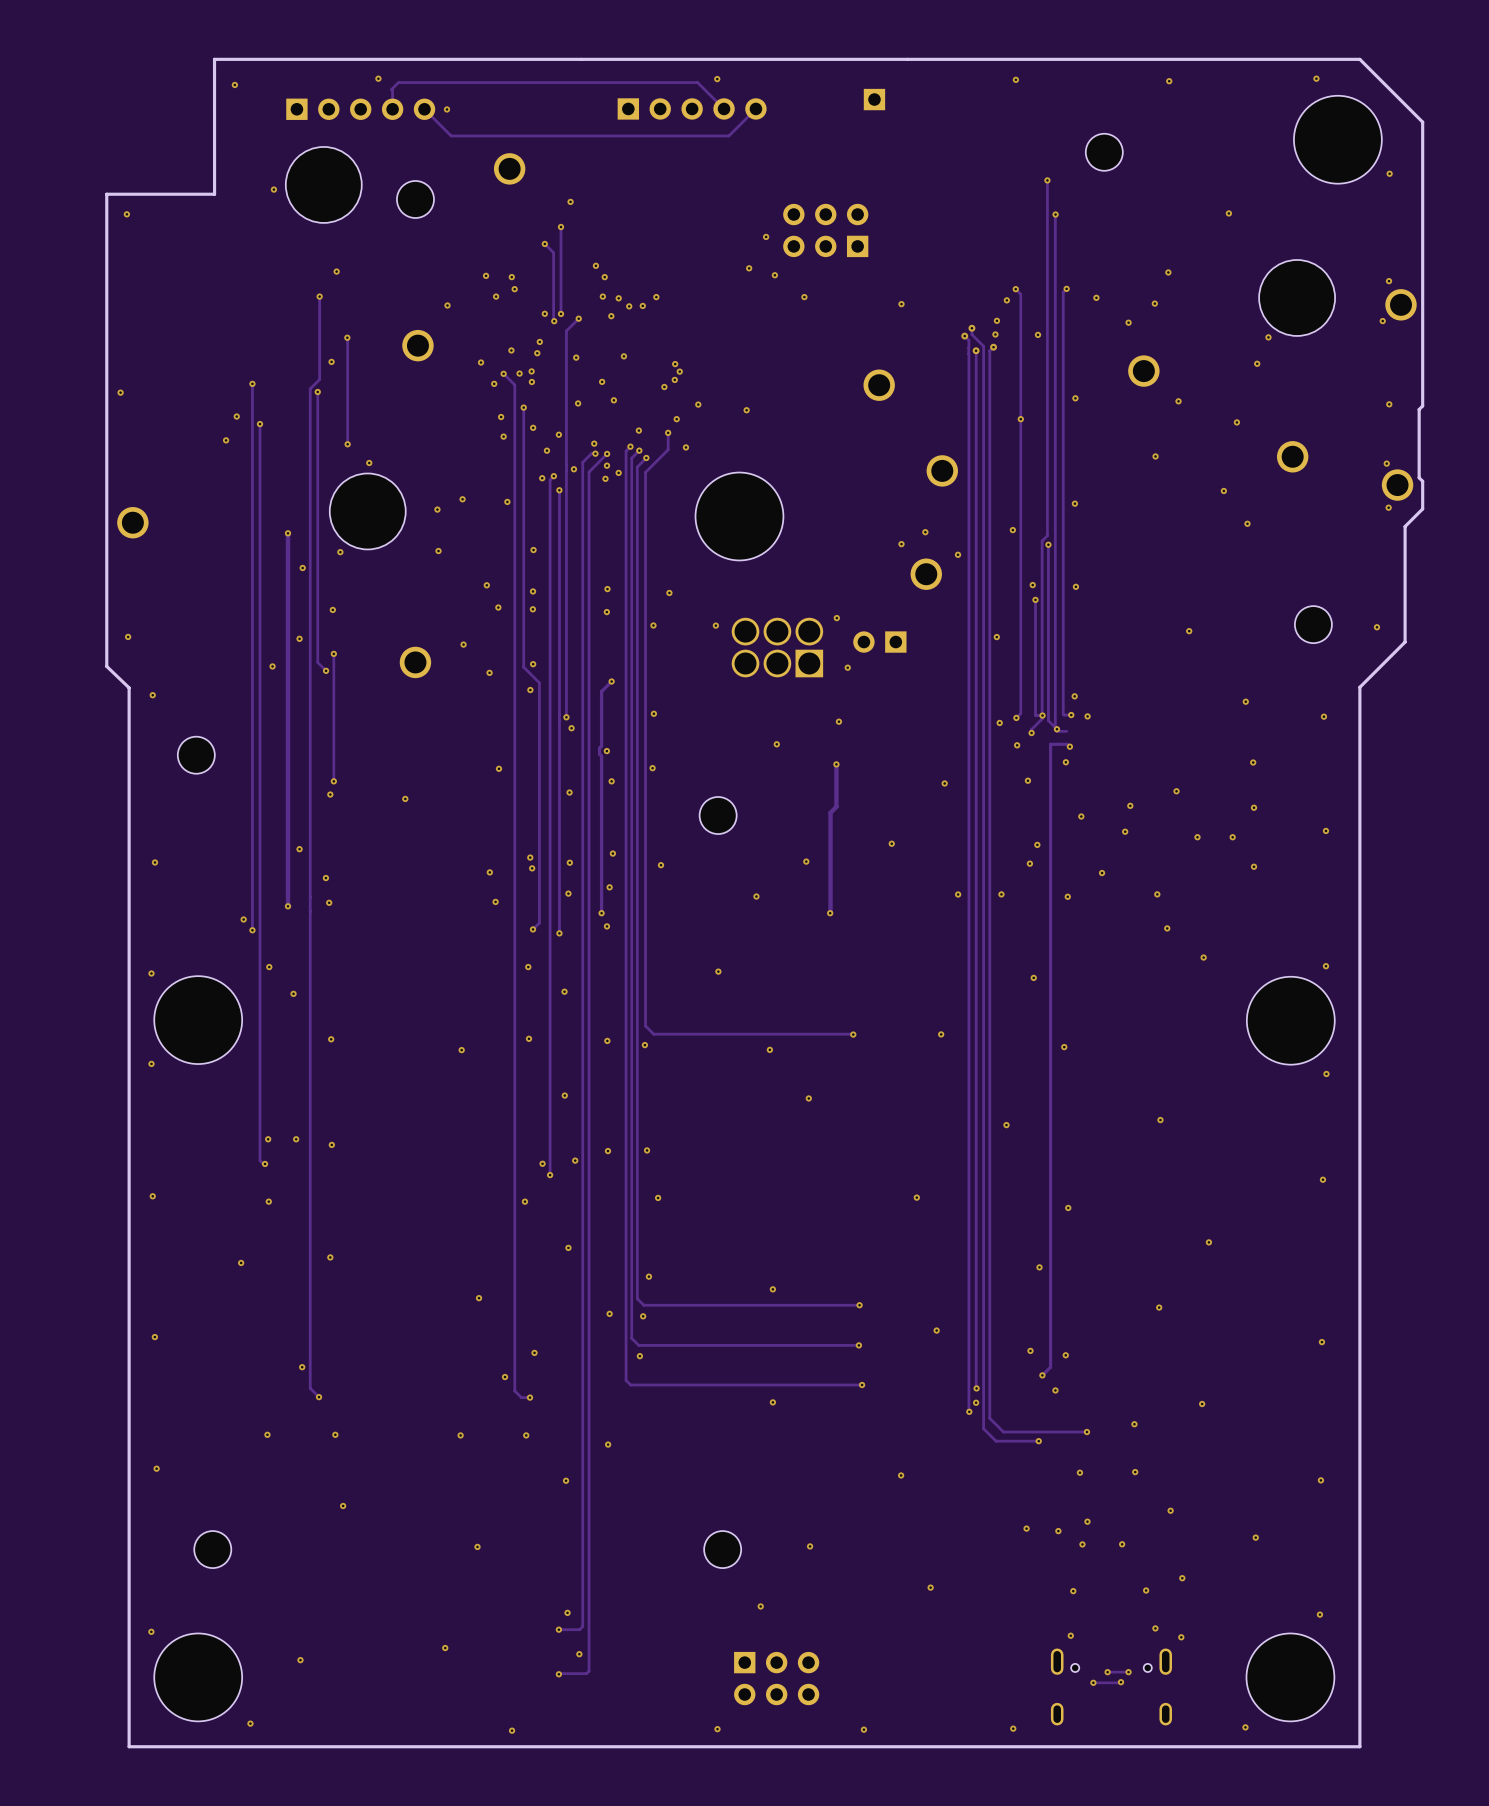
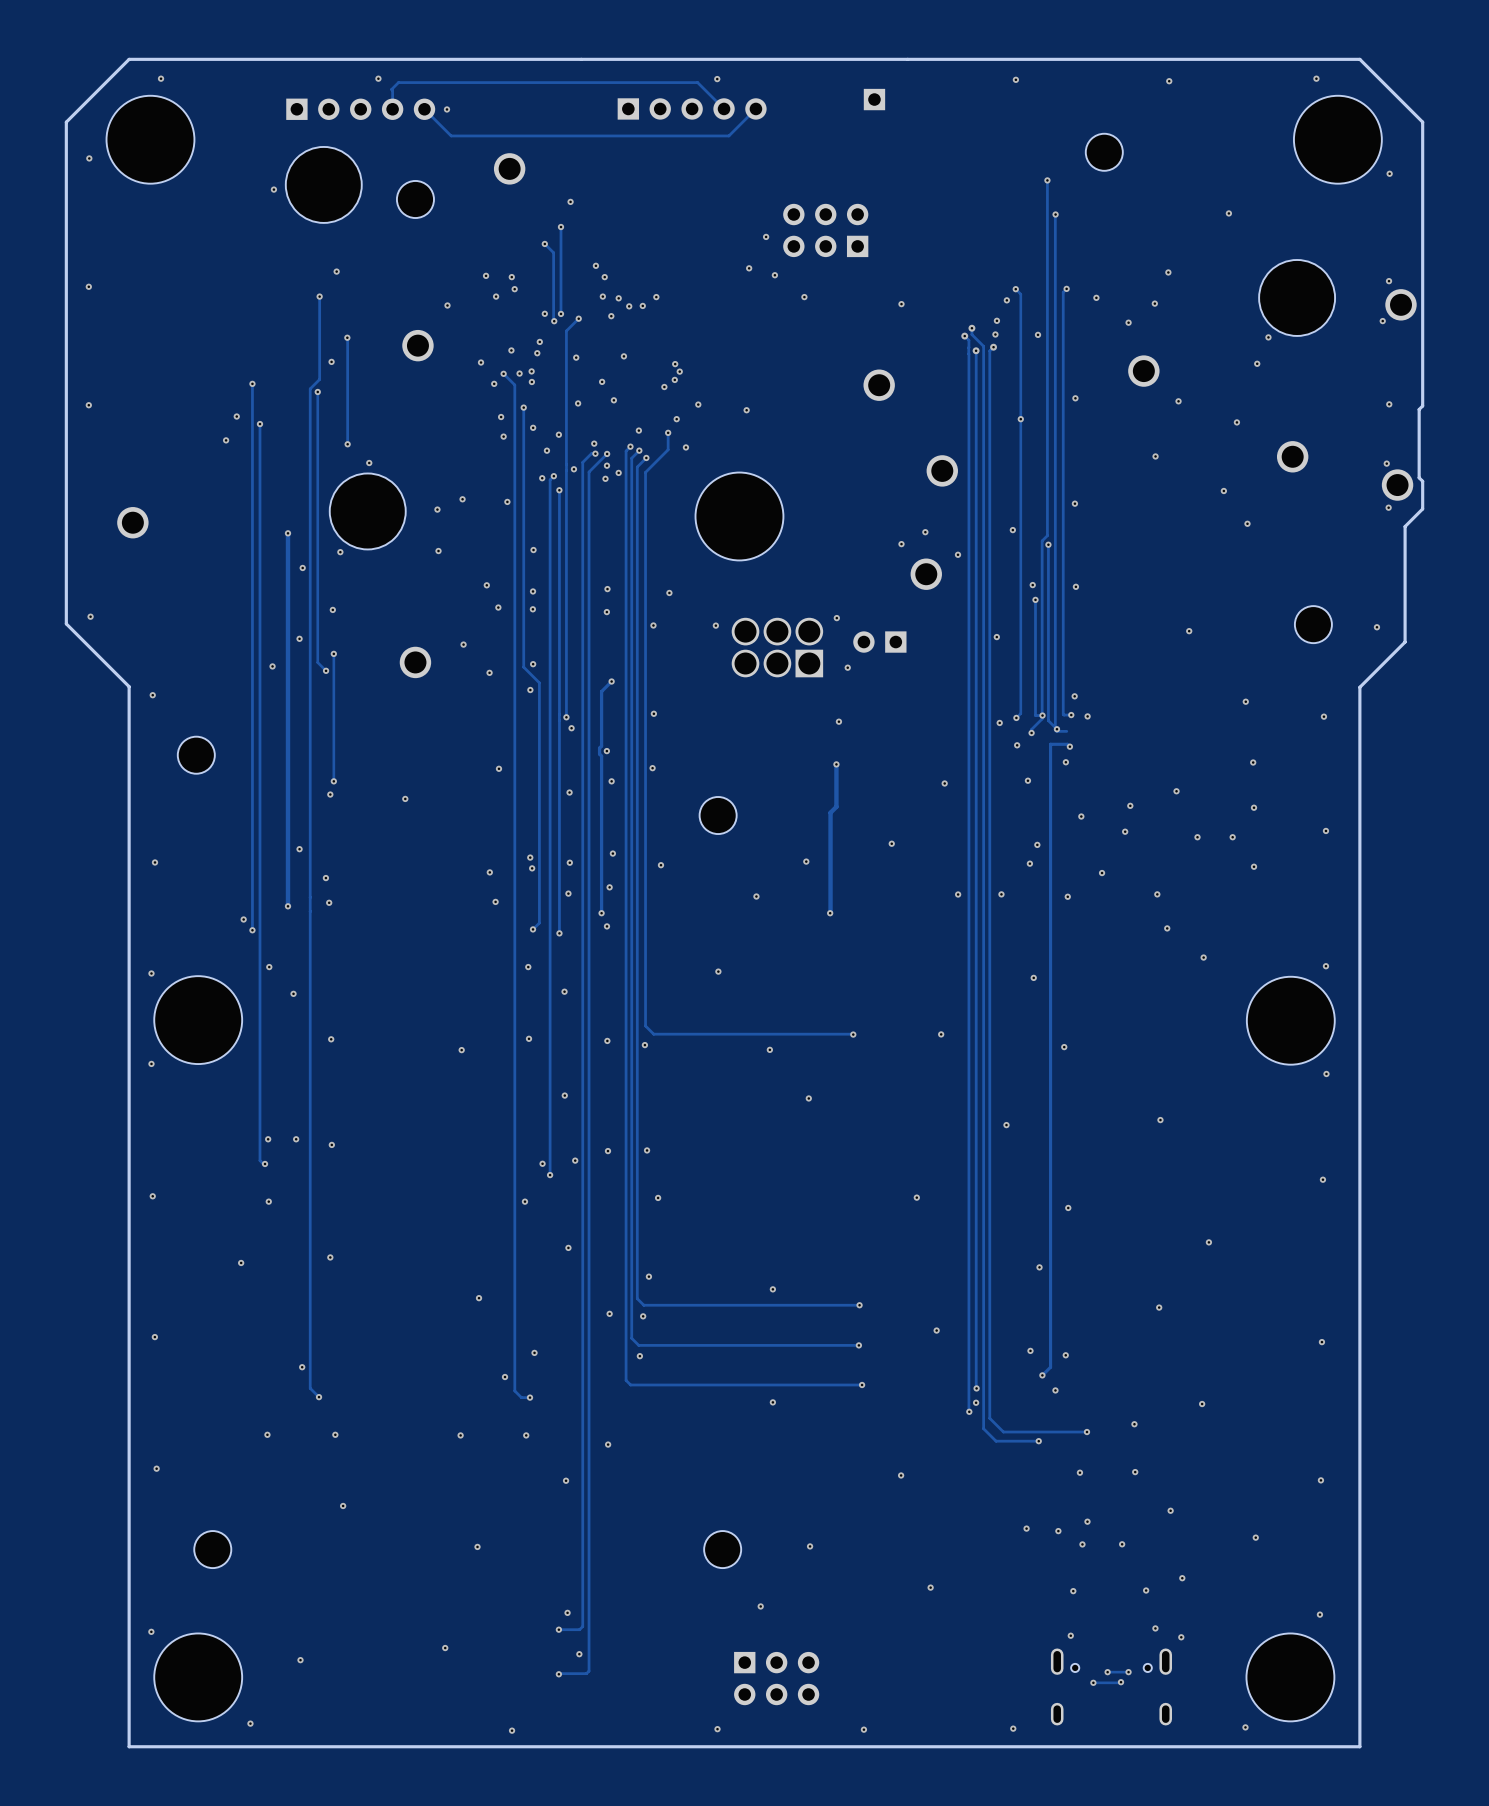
board edge: (214, 59) (214, 194) (106, 194) (106, 666) (129, 687) -> (214, 59) (129, 59) (66, 122) (66, 623) (129, 687)
via: none -> (161, 78)
via: (234, 84) -> none
part: none -> (150, 139)
via: none -> (89, 158)
via: (126, 214) -> none
via: none -> (88, 286)
via position: (120, 392) -> (88, 405)
via position: (128, 636) -> (90, 616)
via: (776, 744) -> none

